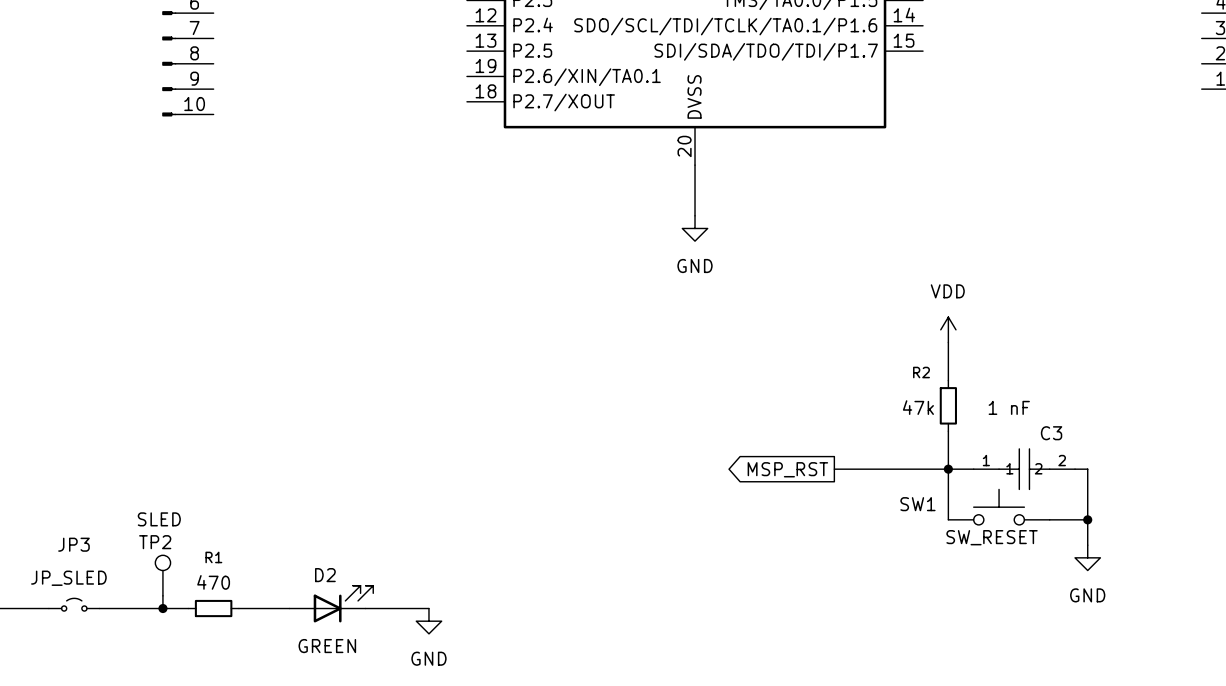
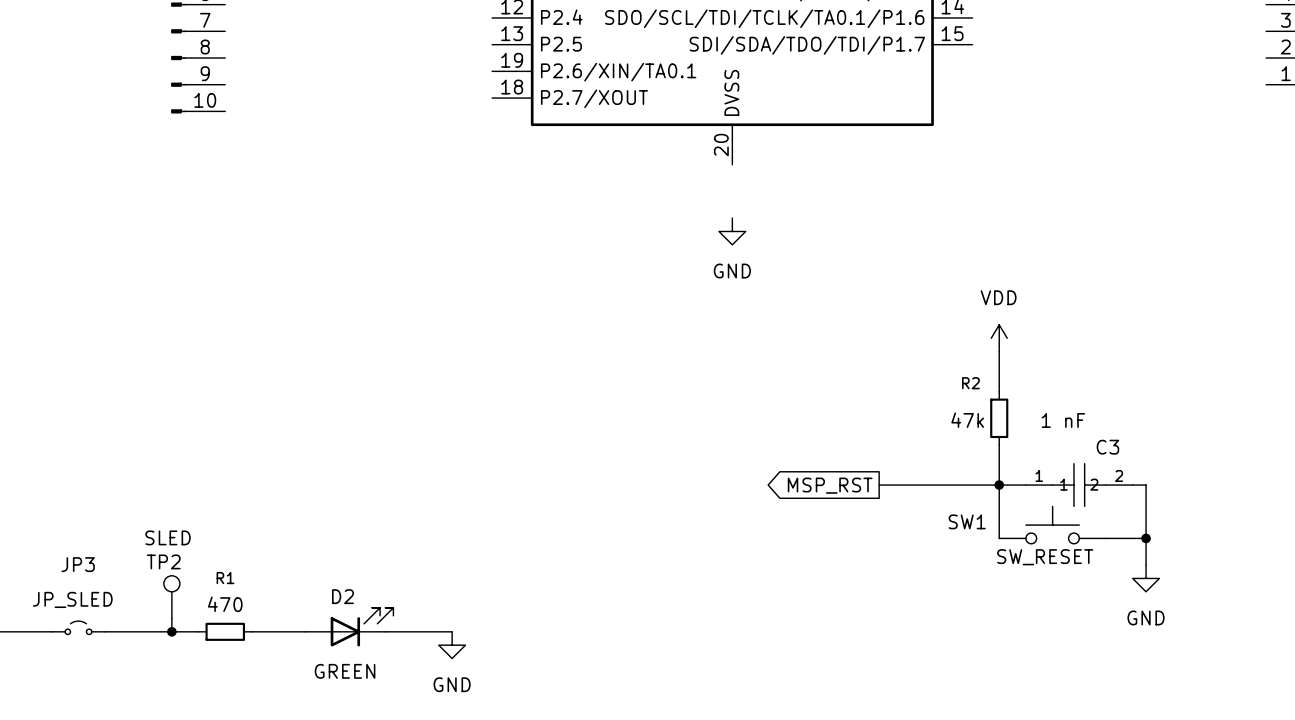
wire: (695, 165) (695, 215) -> none

